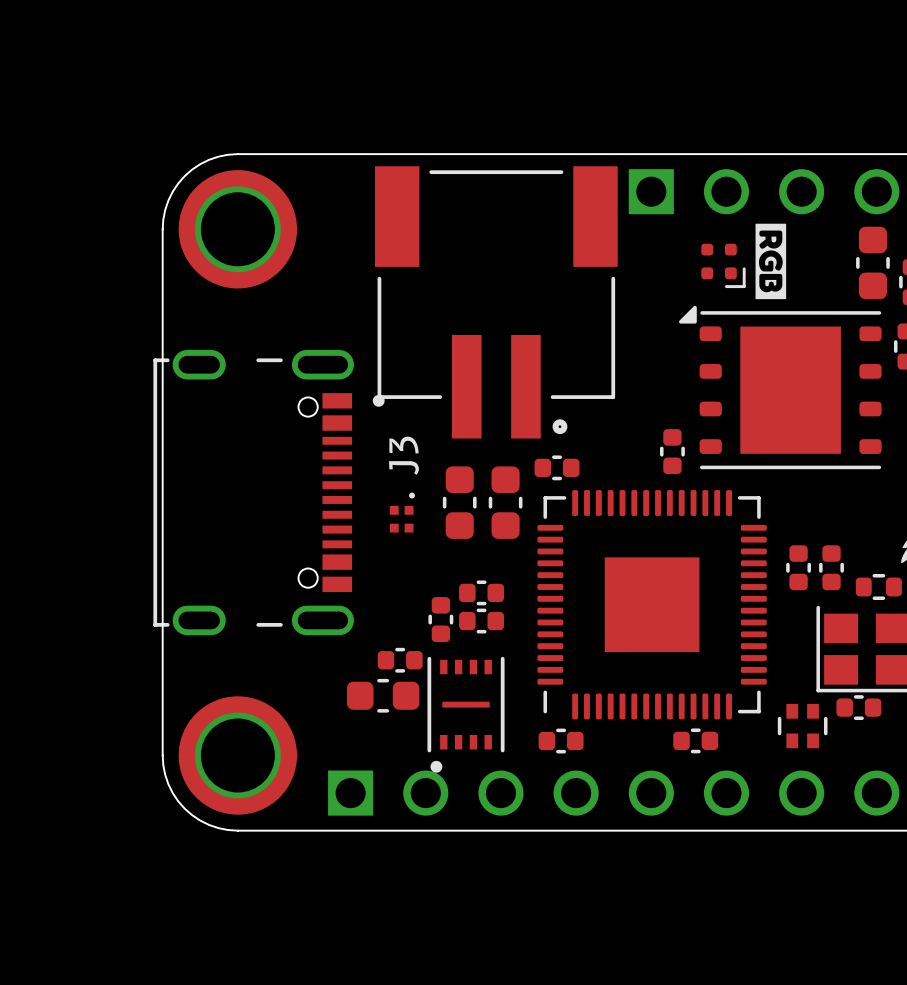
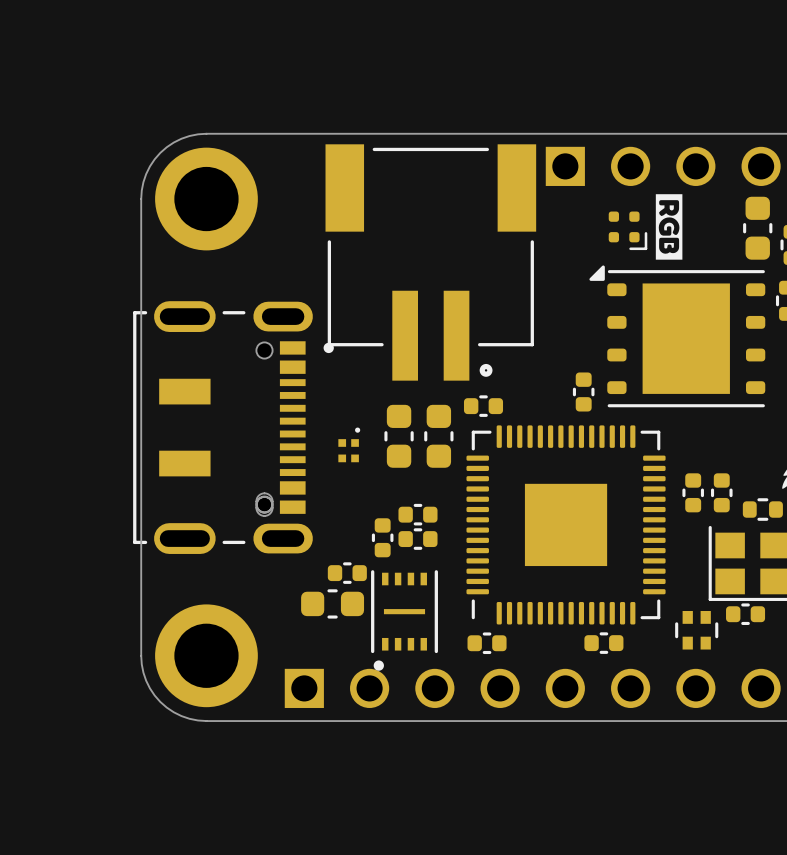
J3: (269, 492) -> none
part: none -> (233, 427)

